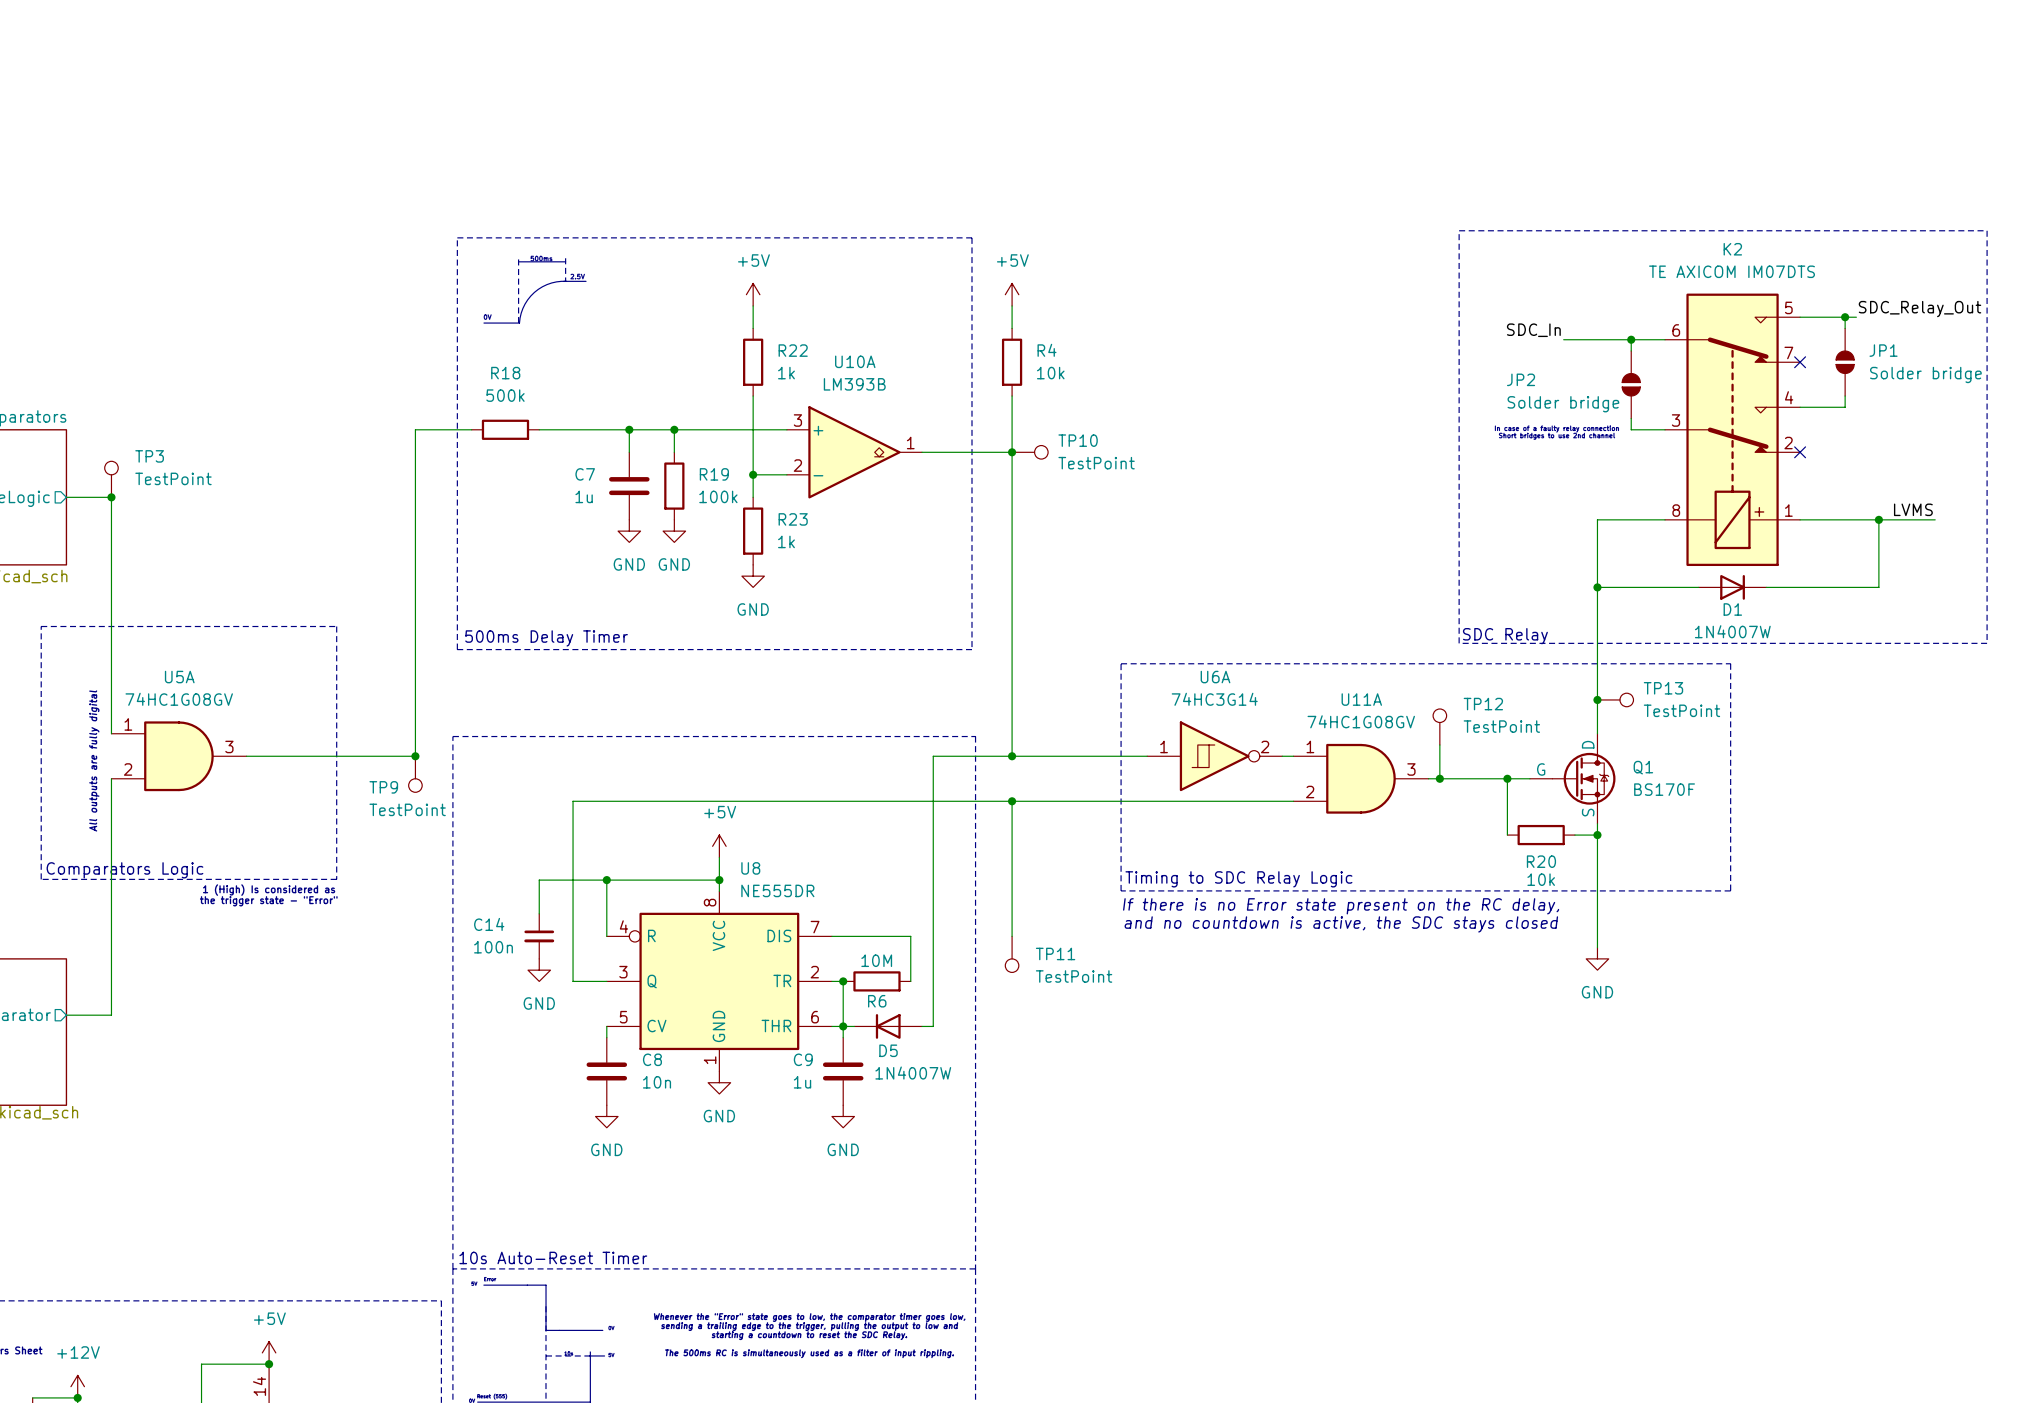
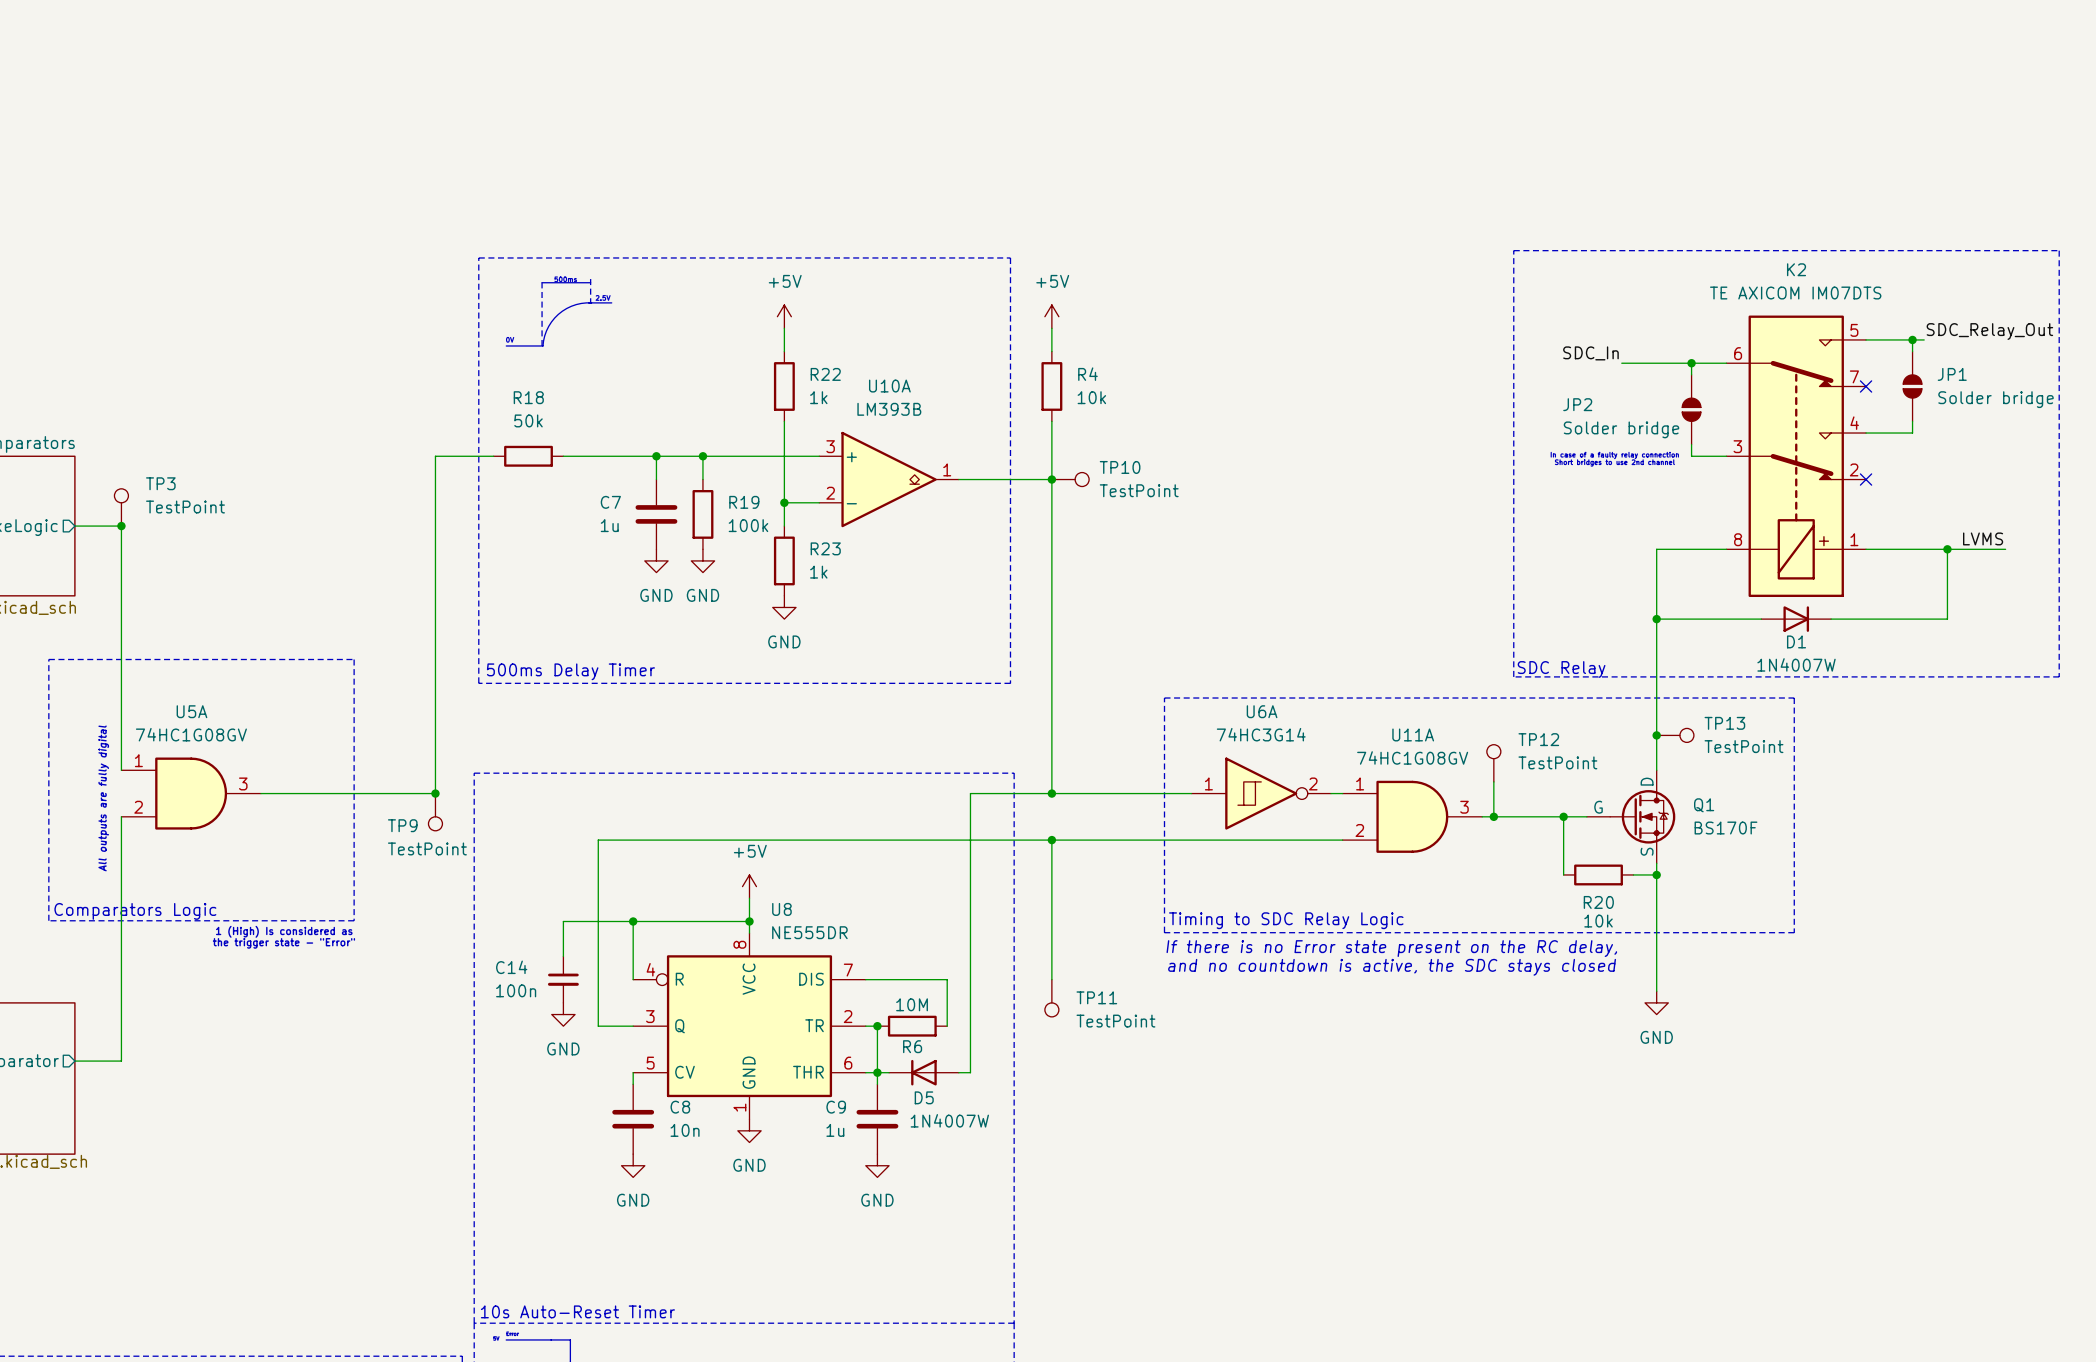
R18 value: 500k (505, 395) -> 50k (528, 420)

